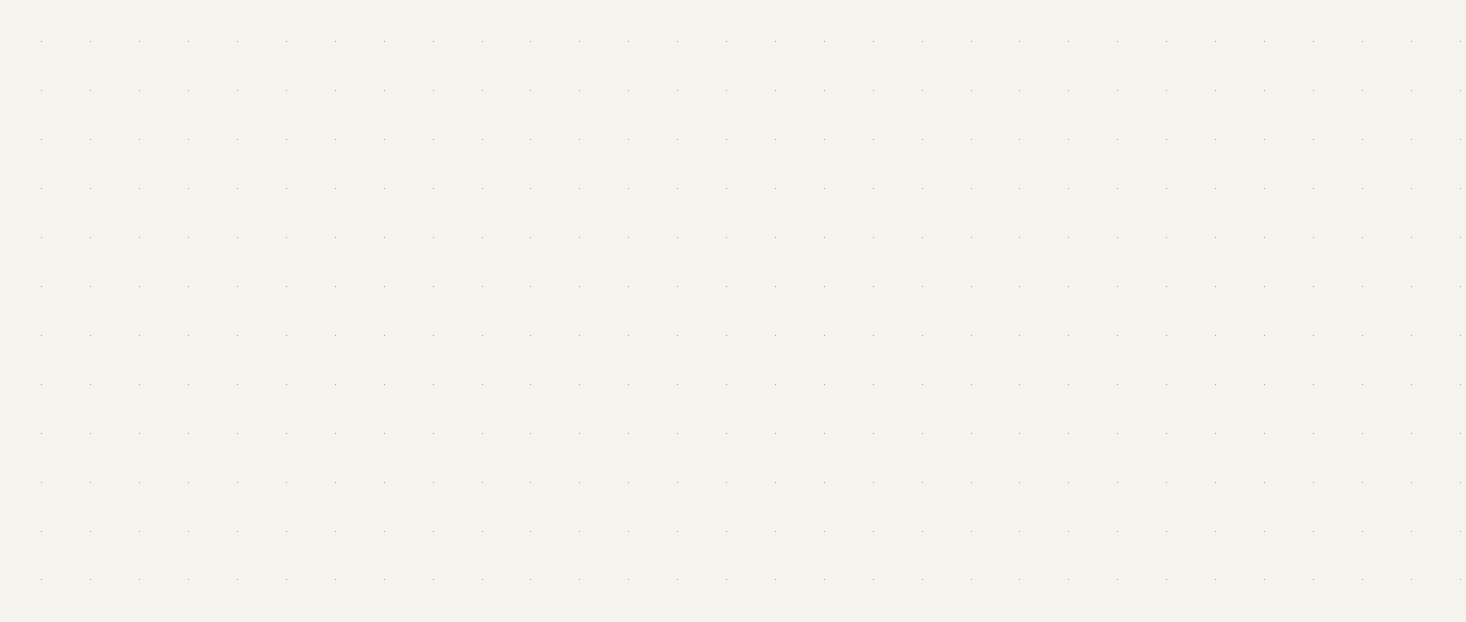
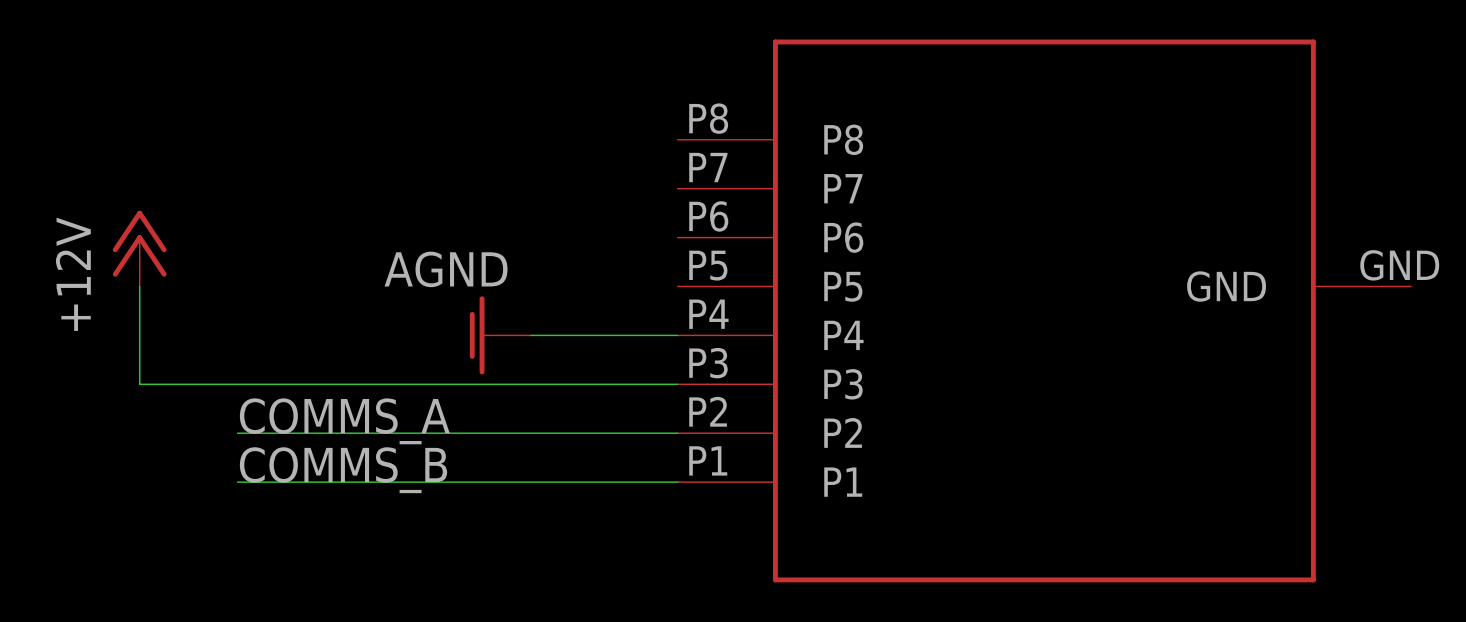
power symbol: none -> +12V (139, 248)
wire: none -> (139, 286) (139, 384) (677, 384)
part: none -> (1044, 310)
power symbol: none -> AGND (500, 335)
wire: none -> (530, 335) (677, 335)
label: none -> COMMS_A (344, 421)
wire: none -> (237, 433) (677, 433)
label: none -> COMMS_B (343, 470)
wire: none -> (237, 482) (677, 482)

